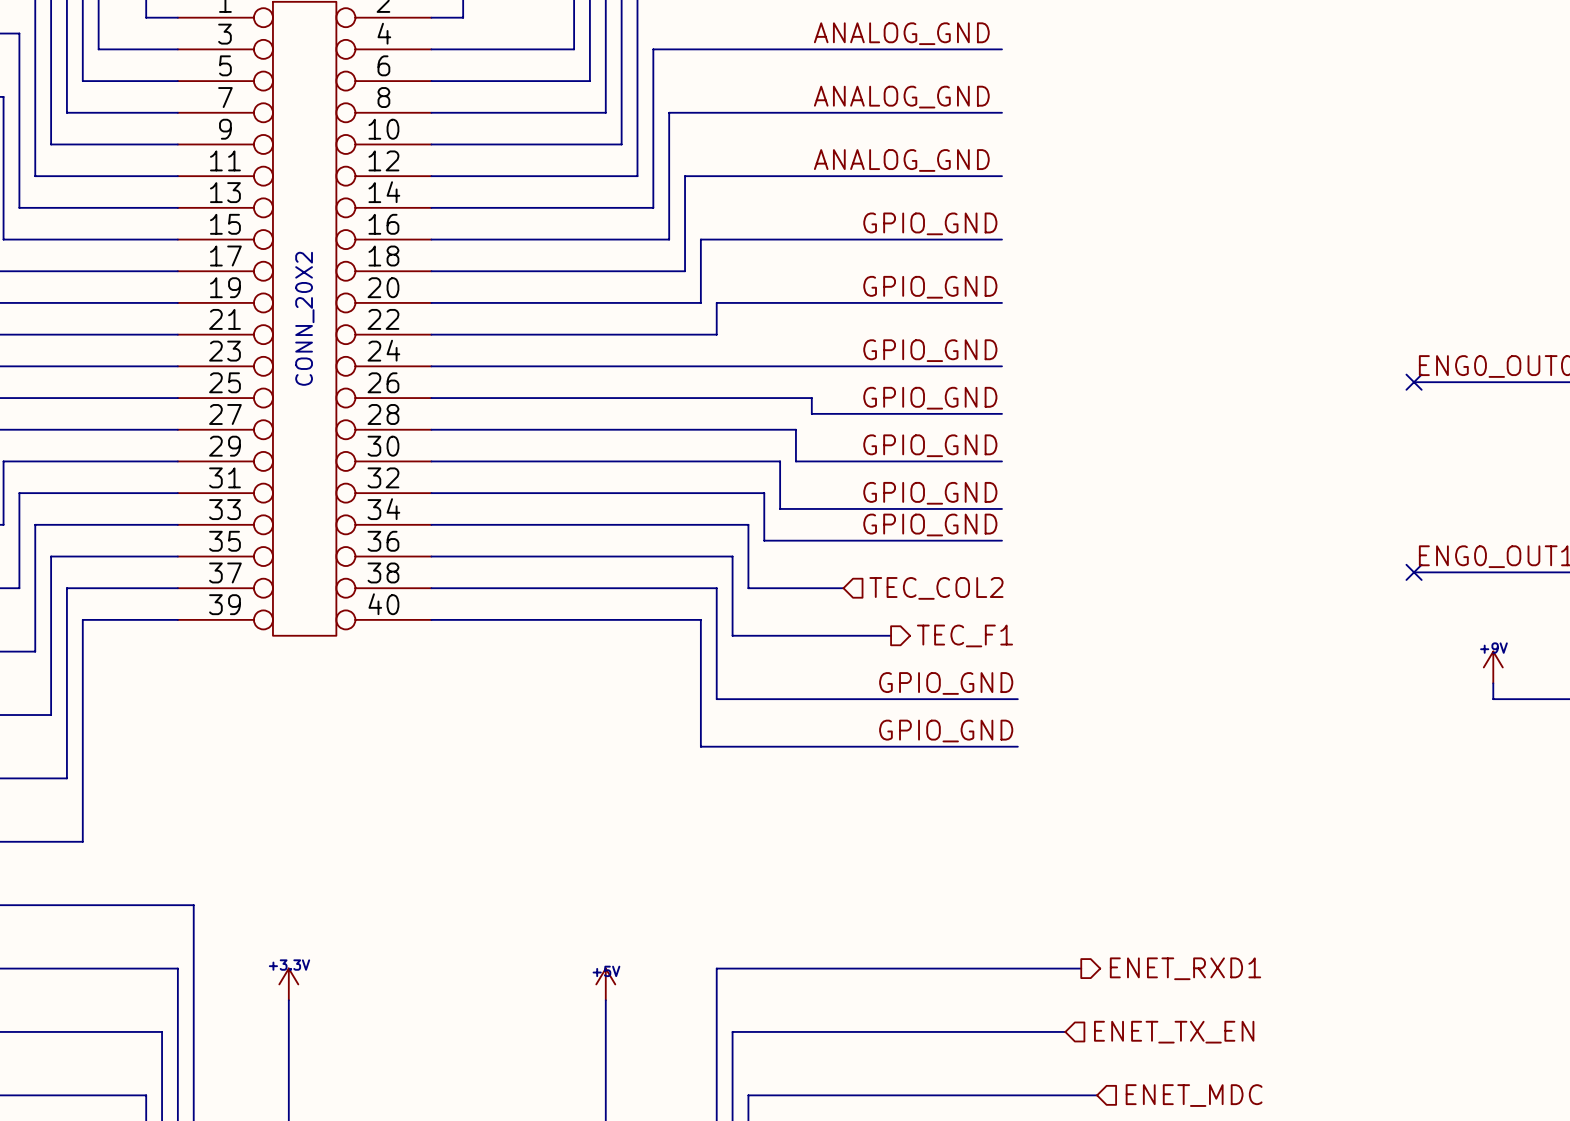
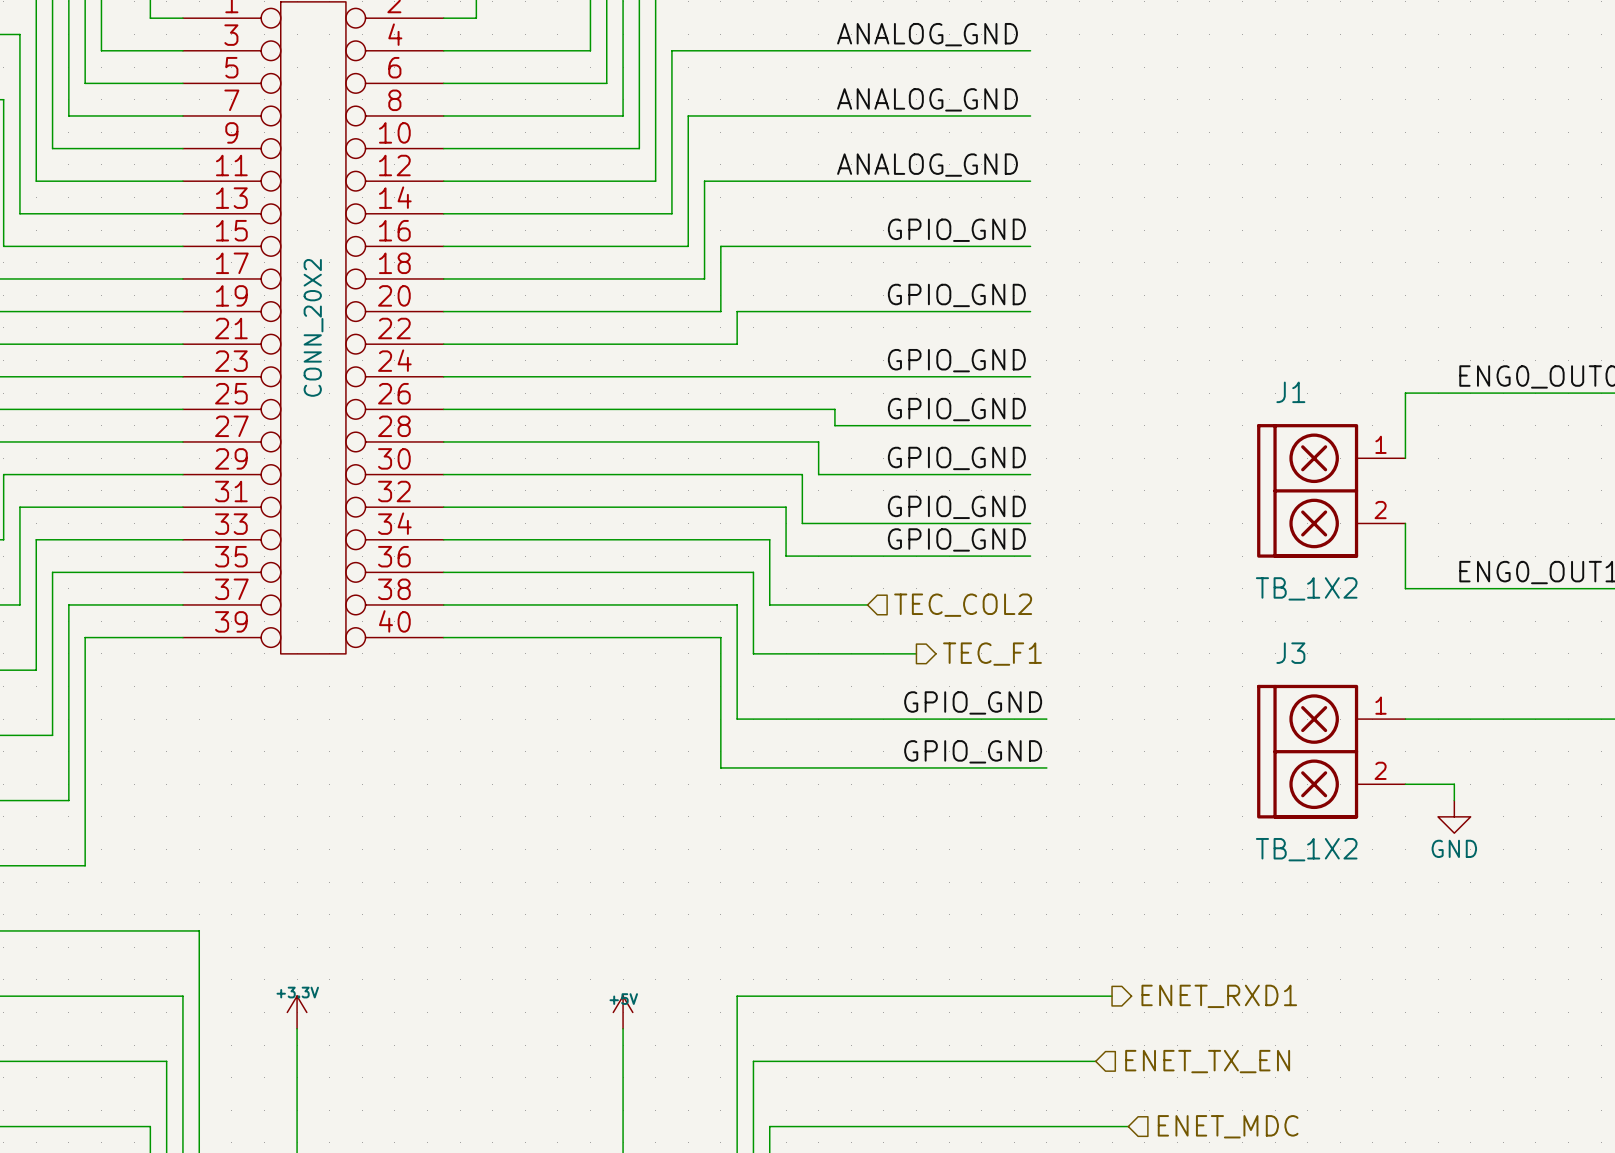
wire: none -> (1454, 393) (1405, 393) (1405, 458)
no-connect mark: (1414, 382) -> none
J1: none -> TB_1X2 (1331, 490)
wire: none -> (1405, 523) (1405, 588) (1454, 588)
no-connect mark: (1414, 572) -> none
power symbol: +9V (1493, 667) -> none
wire: (1493, 683) (1493, 699) -> (1405, 719) (1535, 719)
J3: none -> TB_1X2 (1331, 751)
wire: none -> (1405, 784) (1454, 784) (1454, 800)
power symbol: none -> GND (1454, 816)

